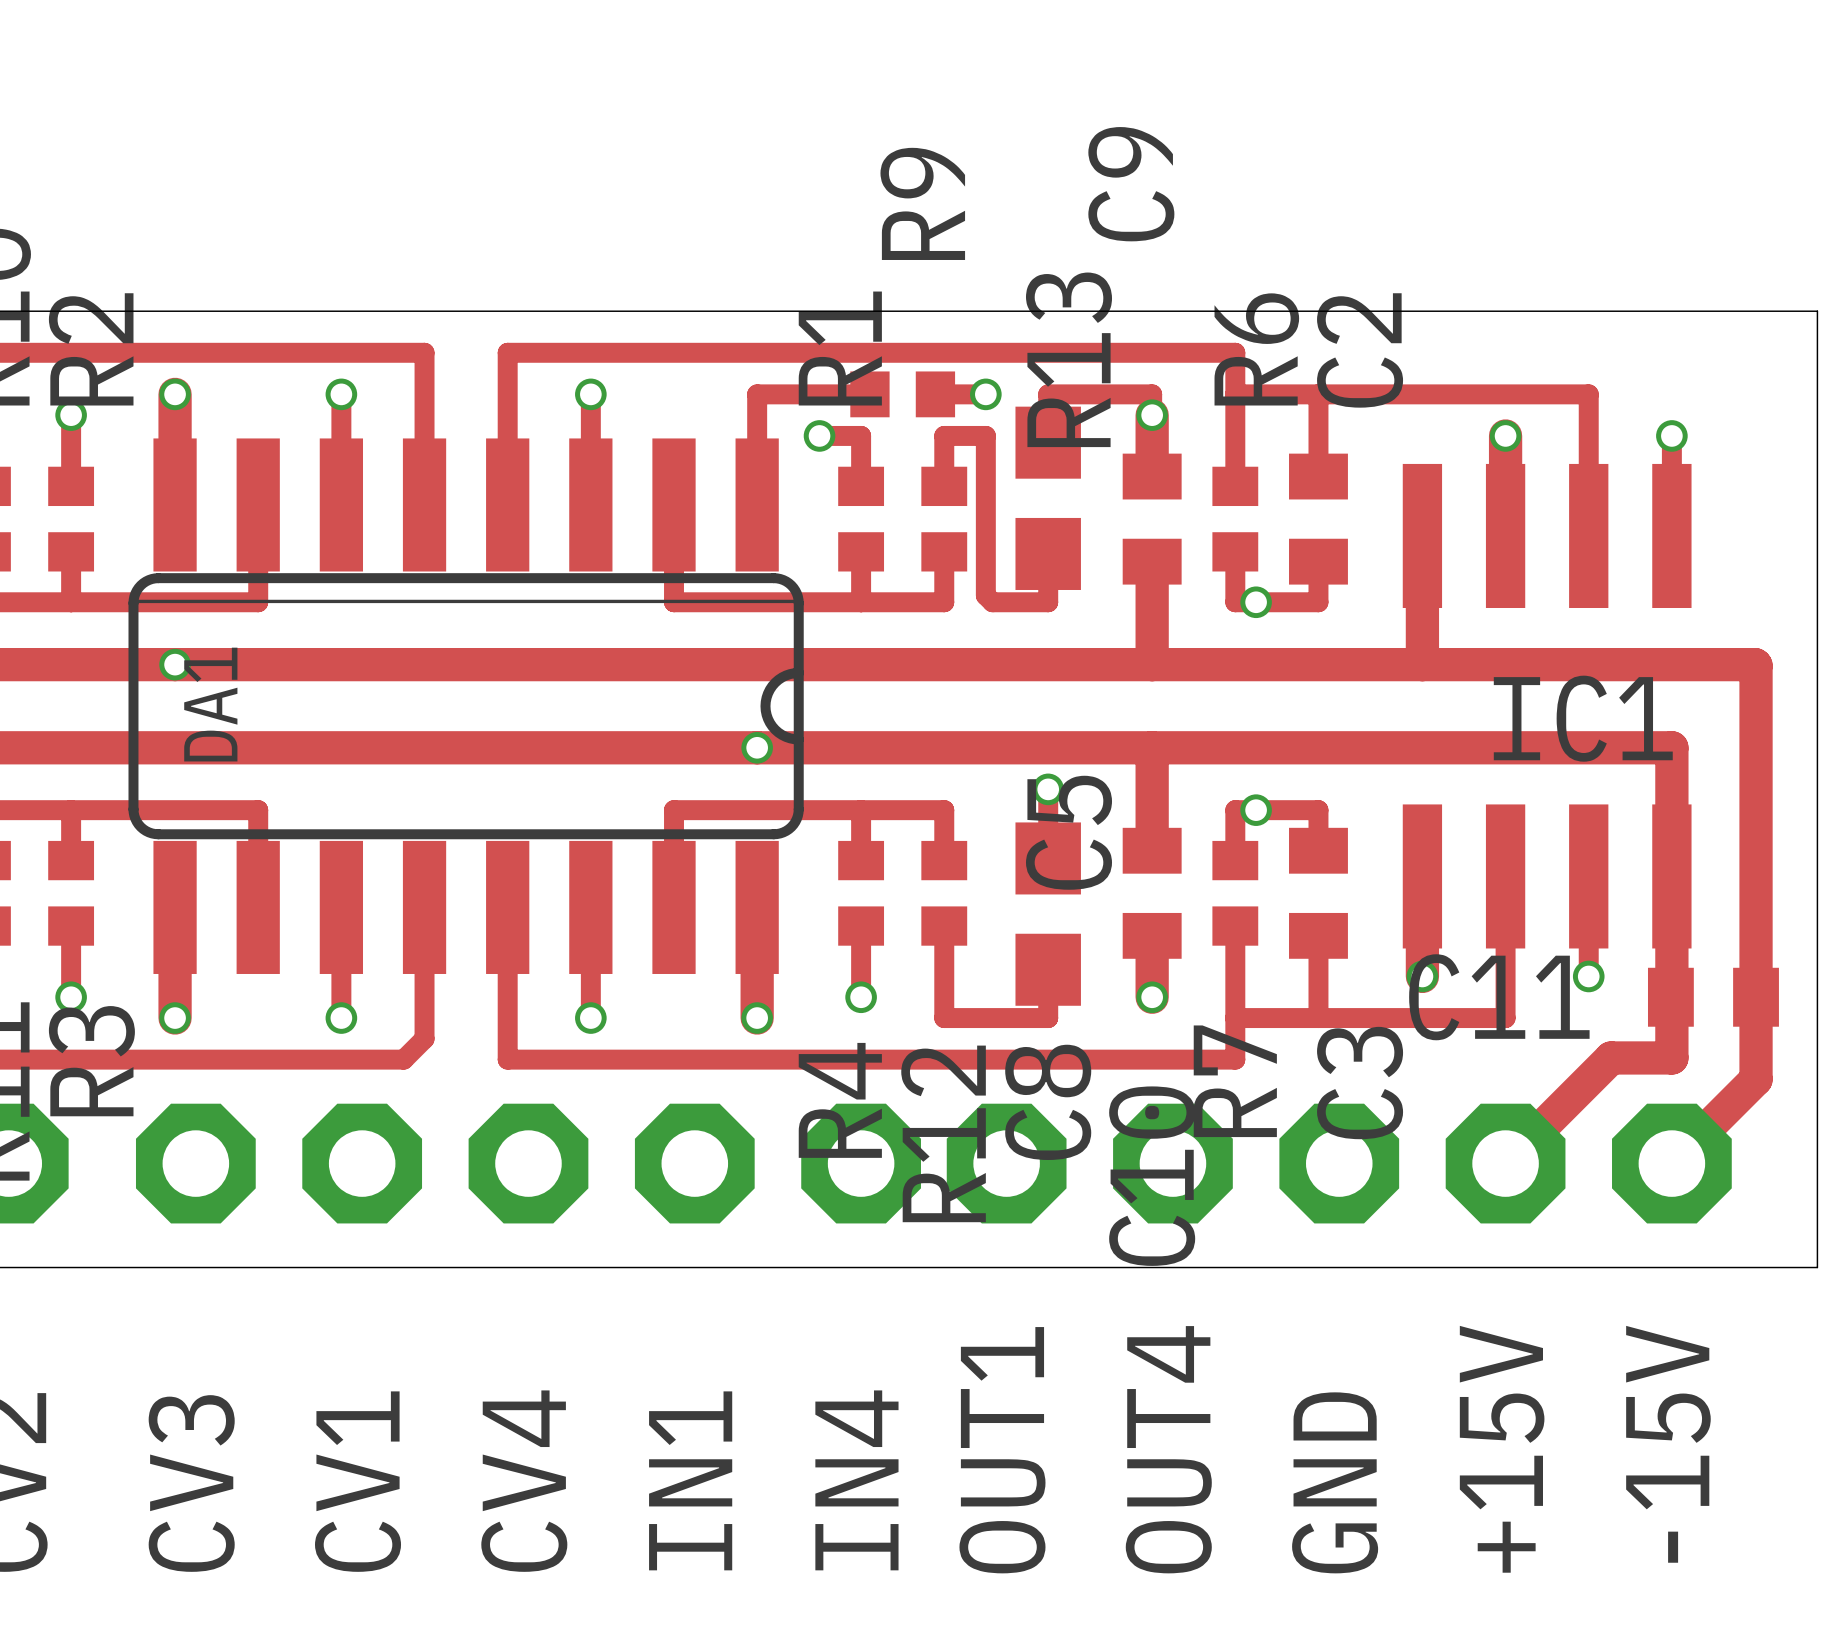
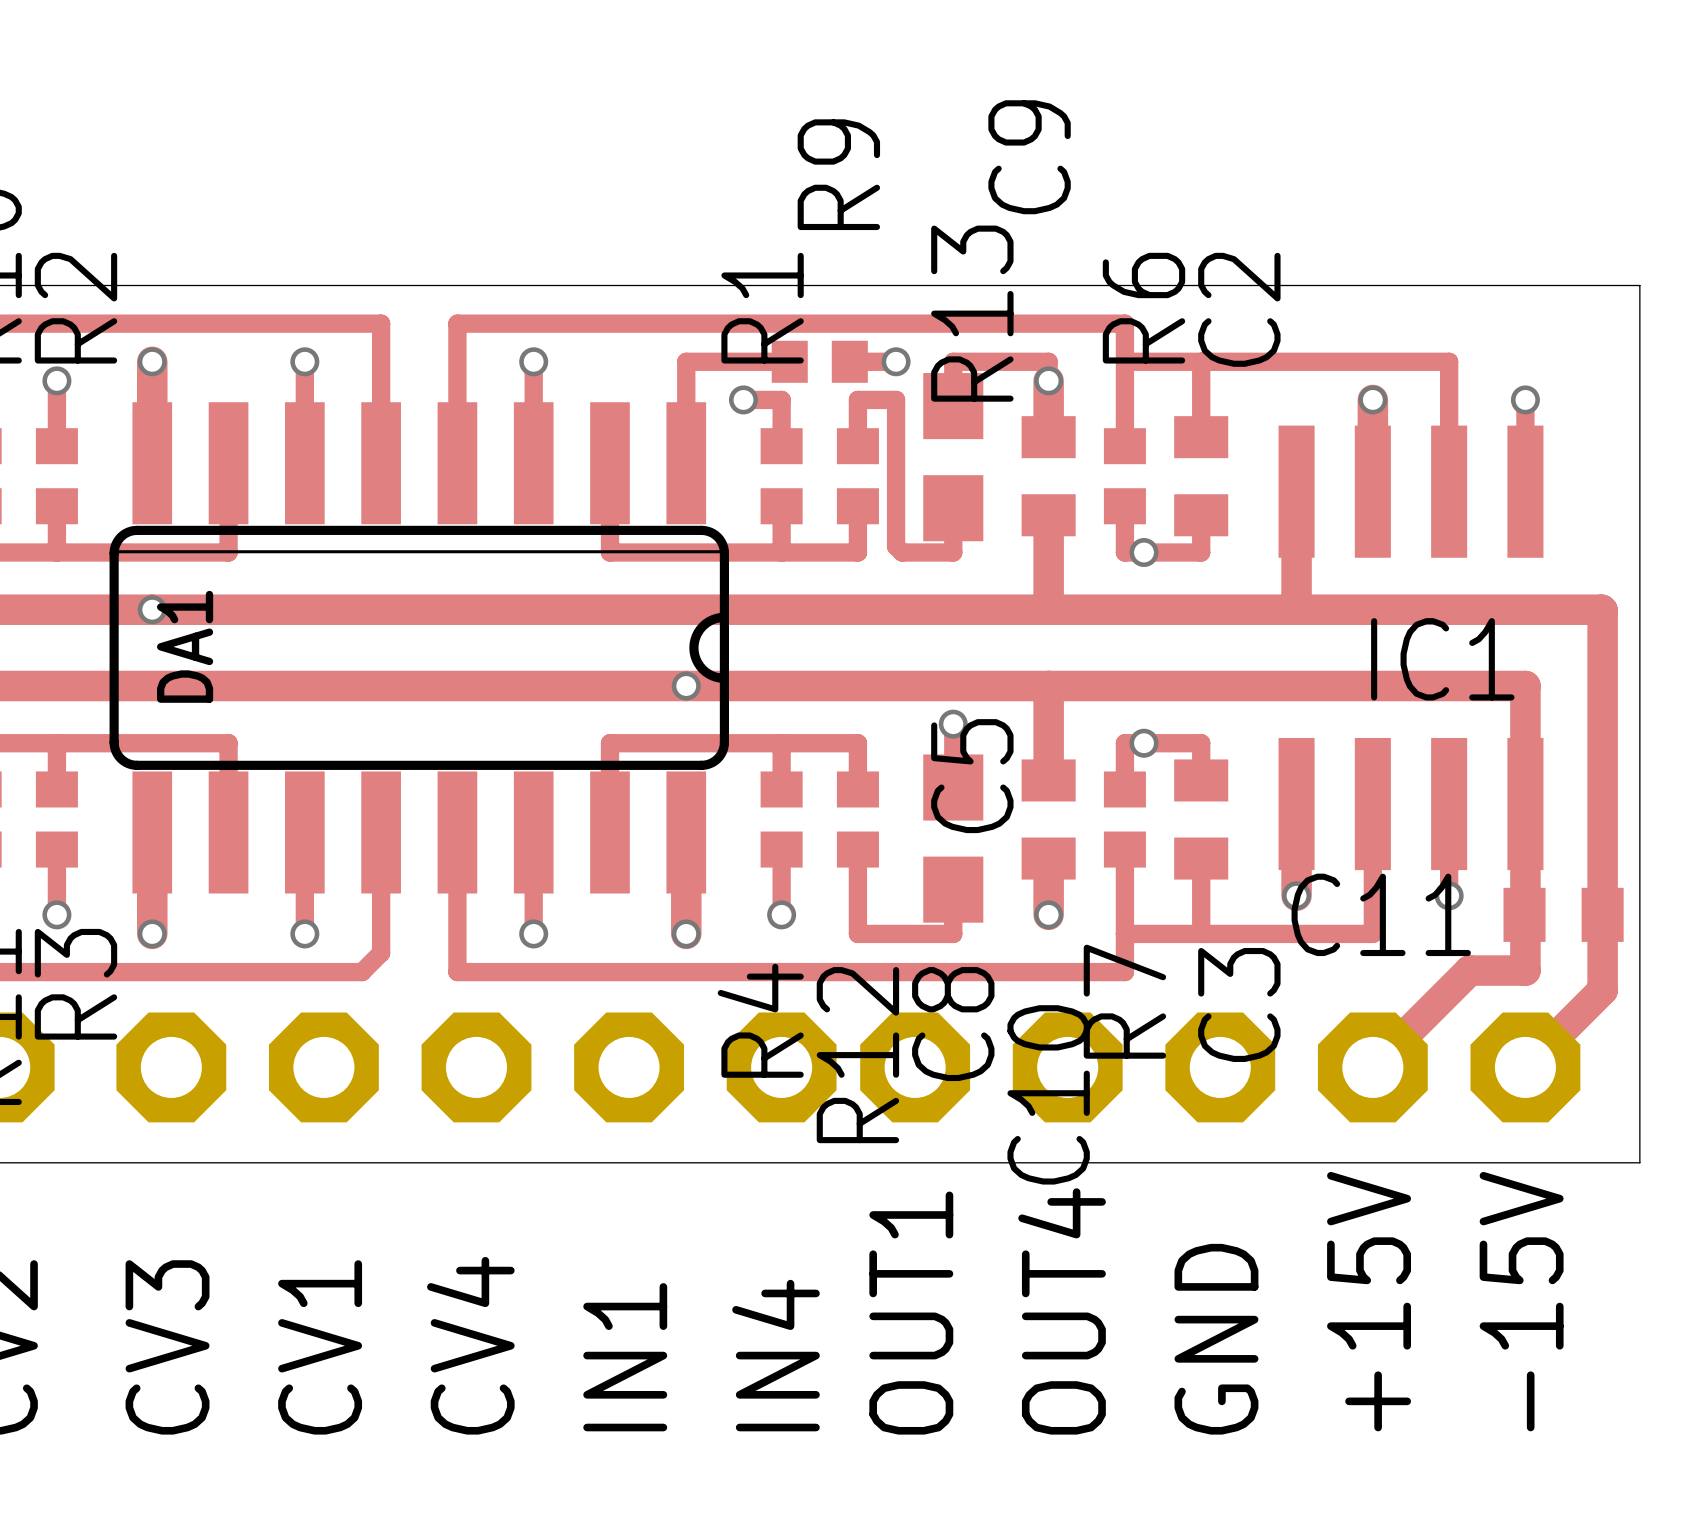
board edge: (1796, 311) (1817, 311) (1817, 1267) (1796, 1267) -> (1639, 285) (1639, 1162)

